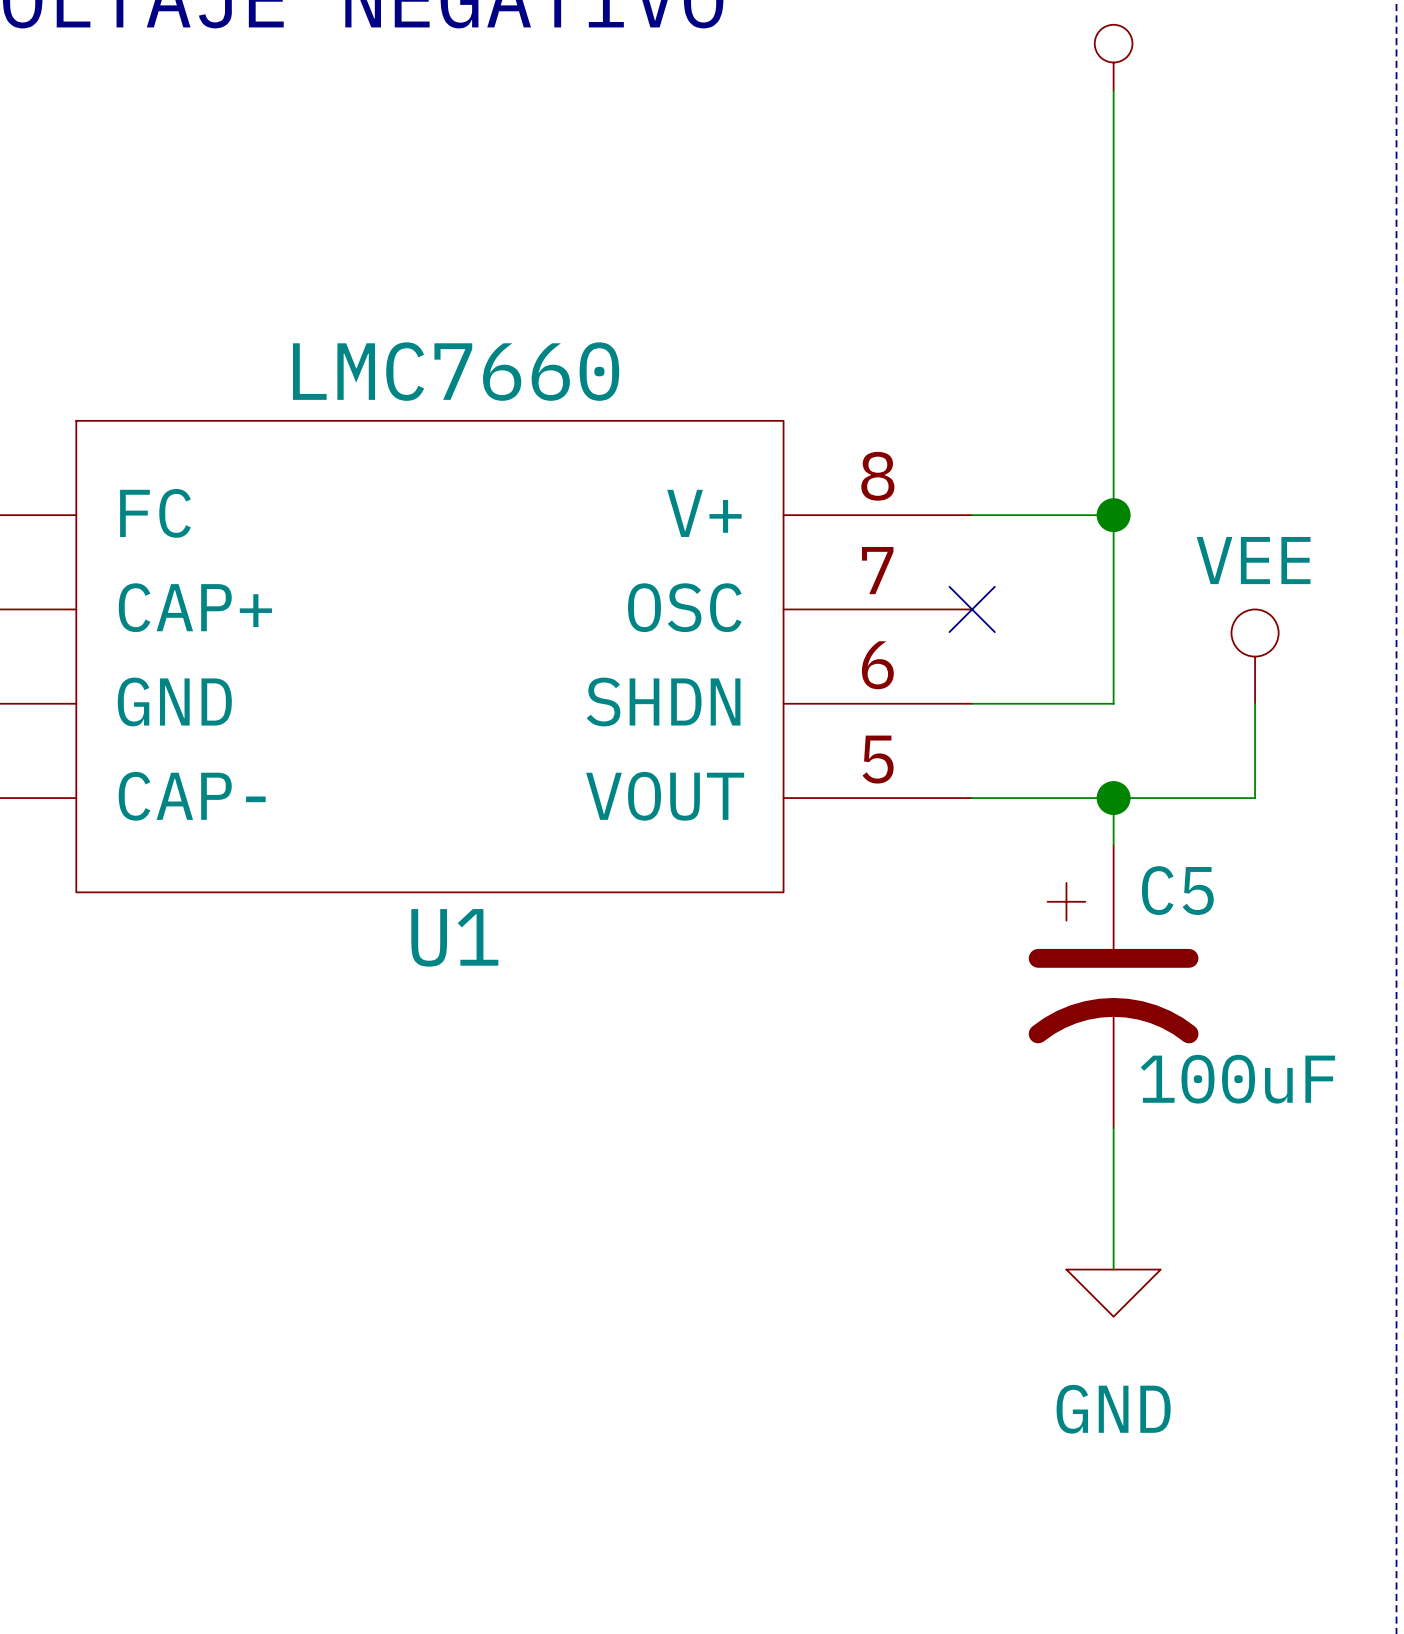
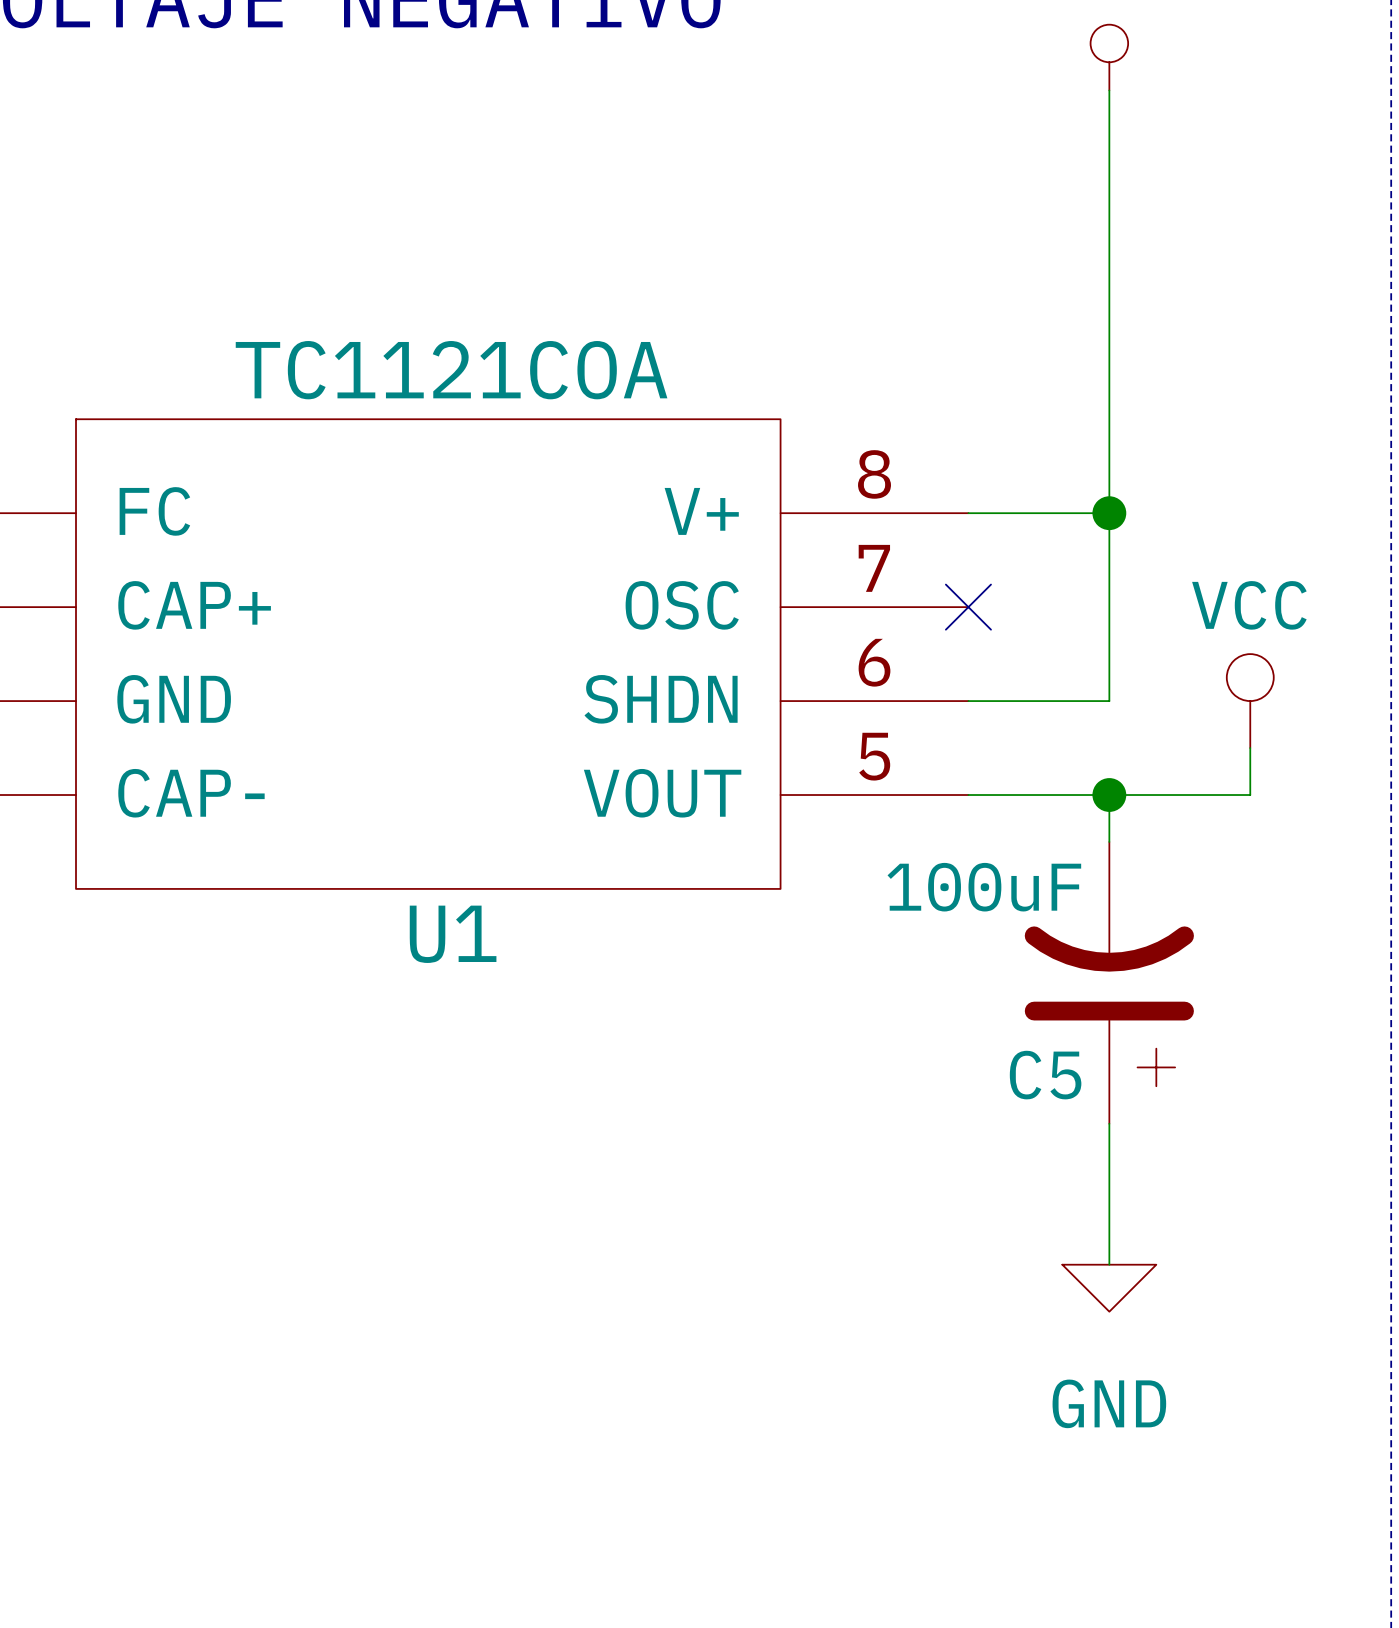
U1 value: LMC7660 (456, 371) -> TC1121COA (451, 370)
power symbol: VEE (1255, 656) -> none
power symbol: none -> VCC (1250, 701)
C5 rotation: 0° (1113, 963) -> 180° (1109, 1006)

